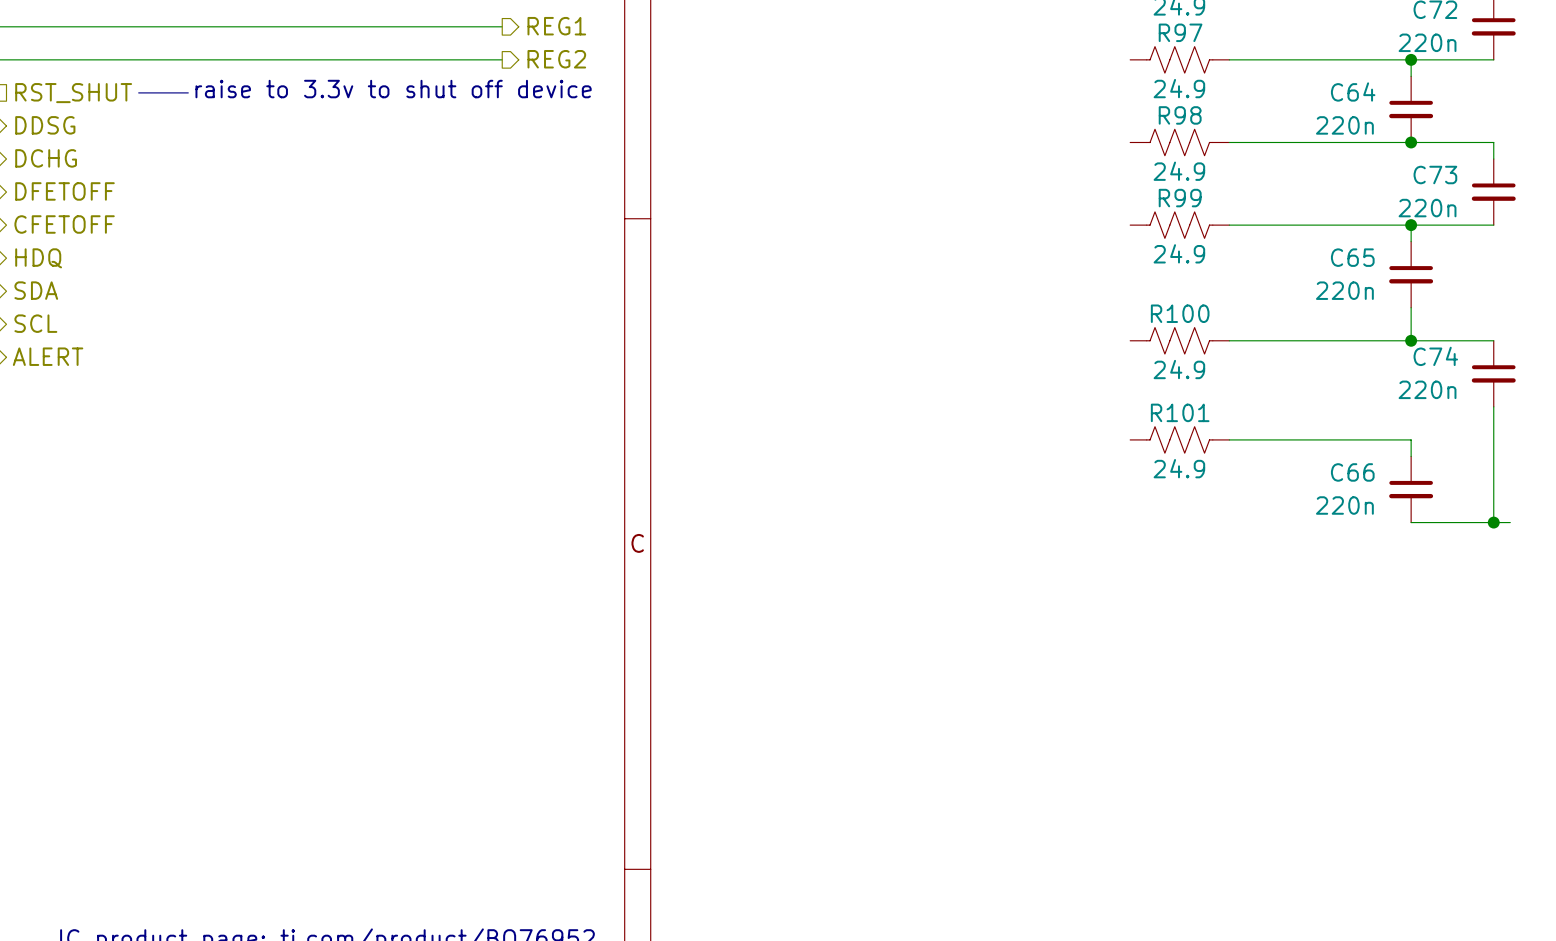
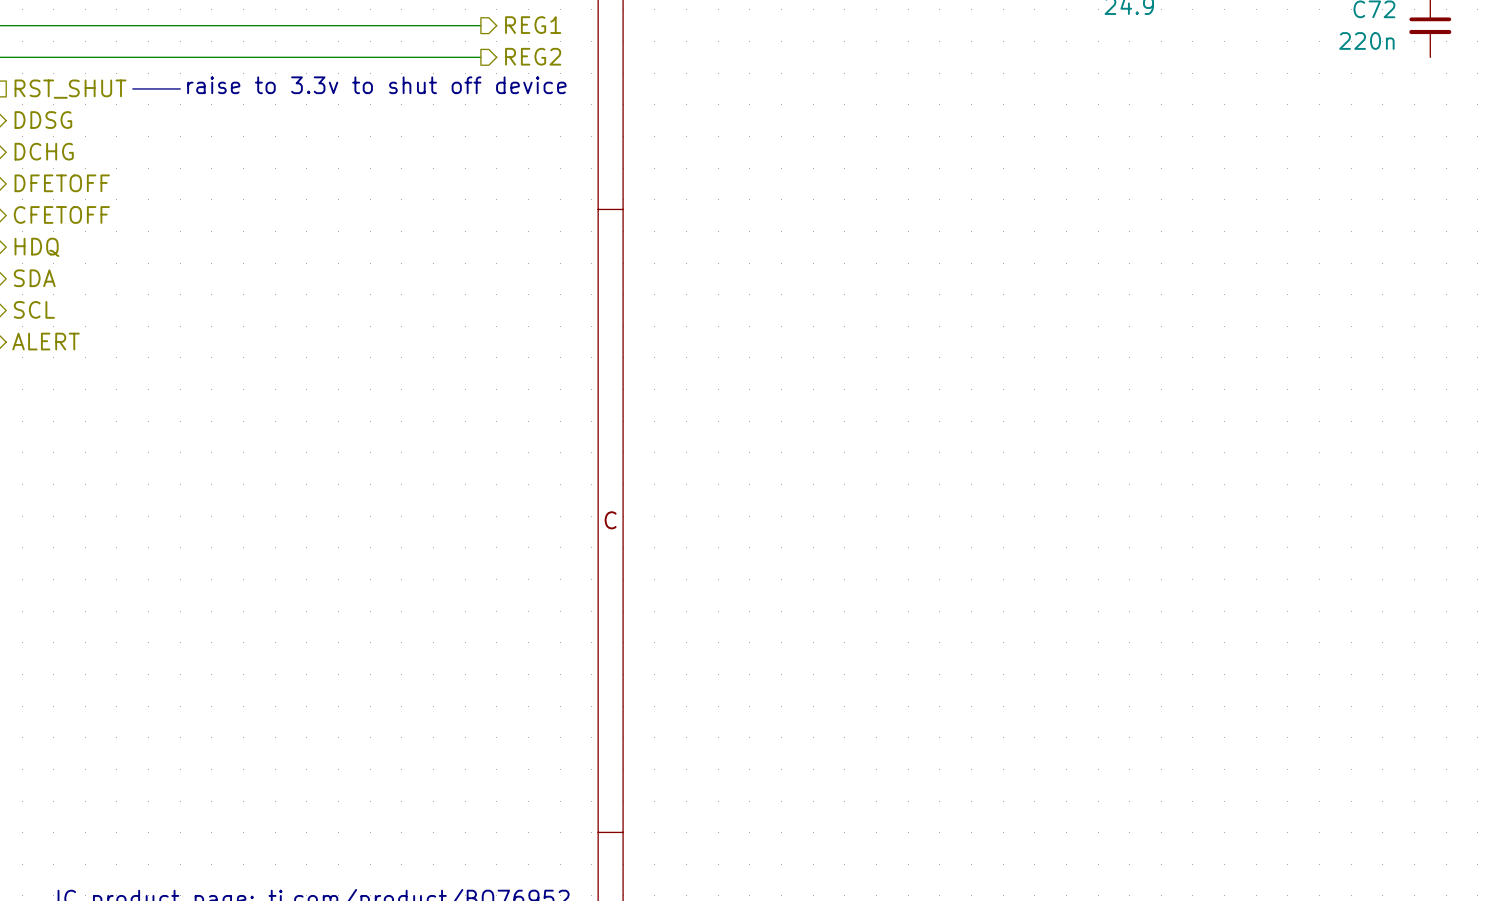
R97: 24.9 (1179, 59) -> none
wire: (1229, 59) (1493, 59) -> none
wire: (1411, 59) (1411, 76) -> none
junction: (1411, 59) -> none
C64: 220n (1411, 109) -> none
R98: 24.9 (1179, 142) -> none
wire: (1229, 142) (1493, 142) (1493, 159) -> none
junction: (1411, 142) -> none
C73: 220n (1493, 192) -> none
R99: 24.9 (1179, 225) -> none
wire: (1229, 225) (1493, 225) -> none
wire: (1411, 225) (1411, 241) -> none
junction: (1411, 225) -> none
C65: 220n (1411, 274) -> none
wire: (1411, 307) (1411, 340) -> none
R100: 24.9 (1179, 340) -> none
wire: (1229, 340) (1493, 340) -> none
junction: (1411, 340) -> none
C74: 220n (1493, 373) -> none
wire: (1493, 406) (1493, 522) -> none
R101: 24.9 (1179, 439) -> none
wire: (1229, 439) (1411, 439) (1411, 456) -> none
C66: 220n (1411, 489) -> none
wire: (1411, 522) (1510, 522) -> none
junction: (1493, 522) -> none

